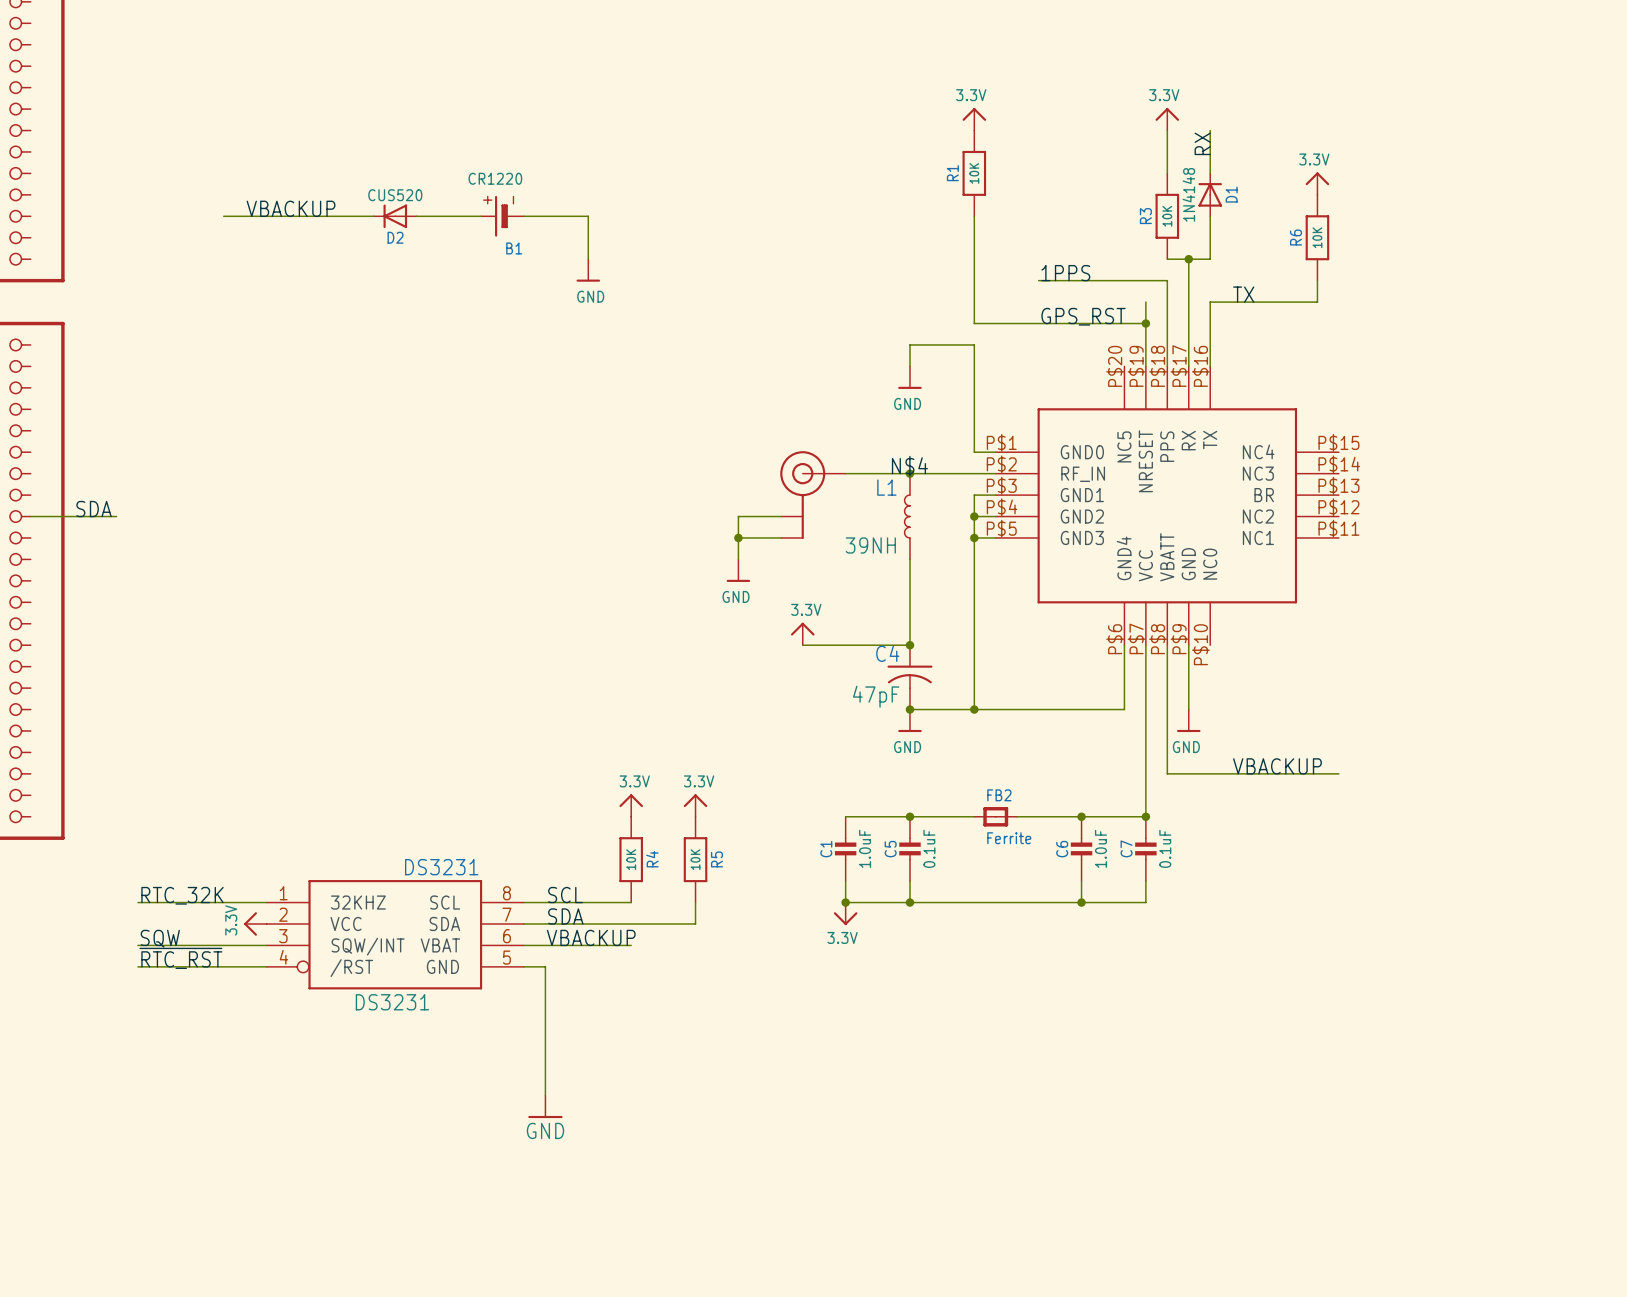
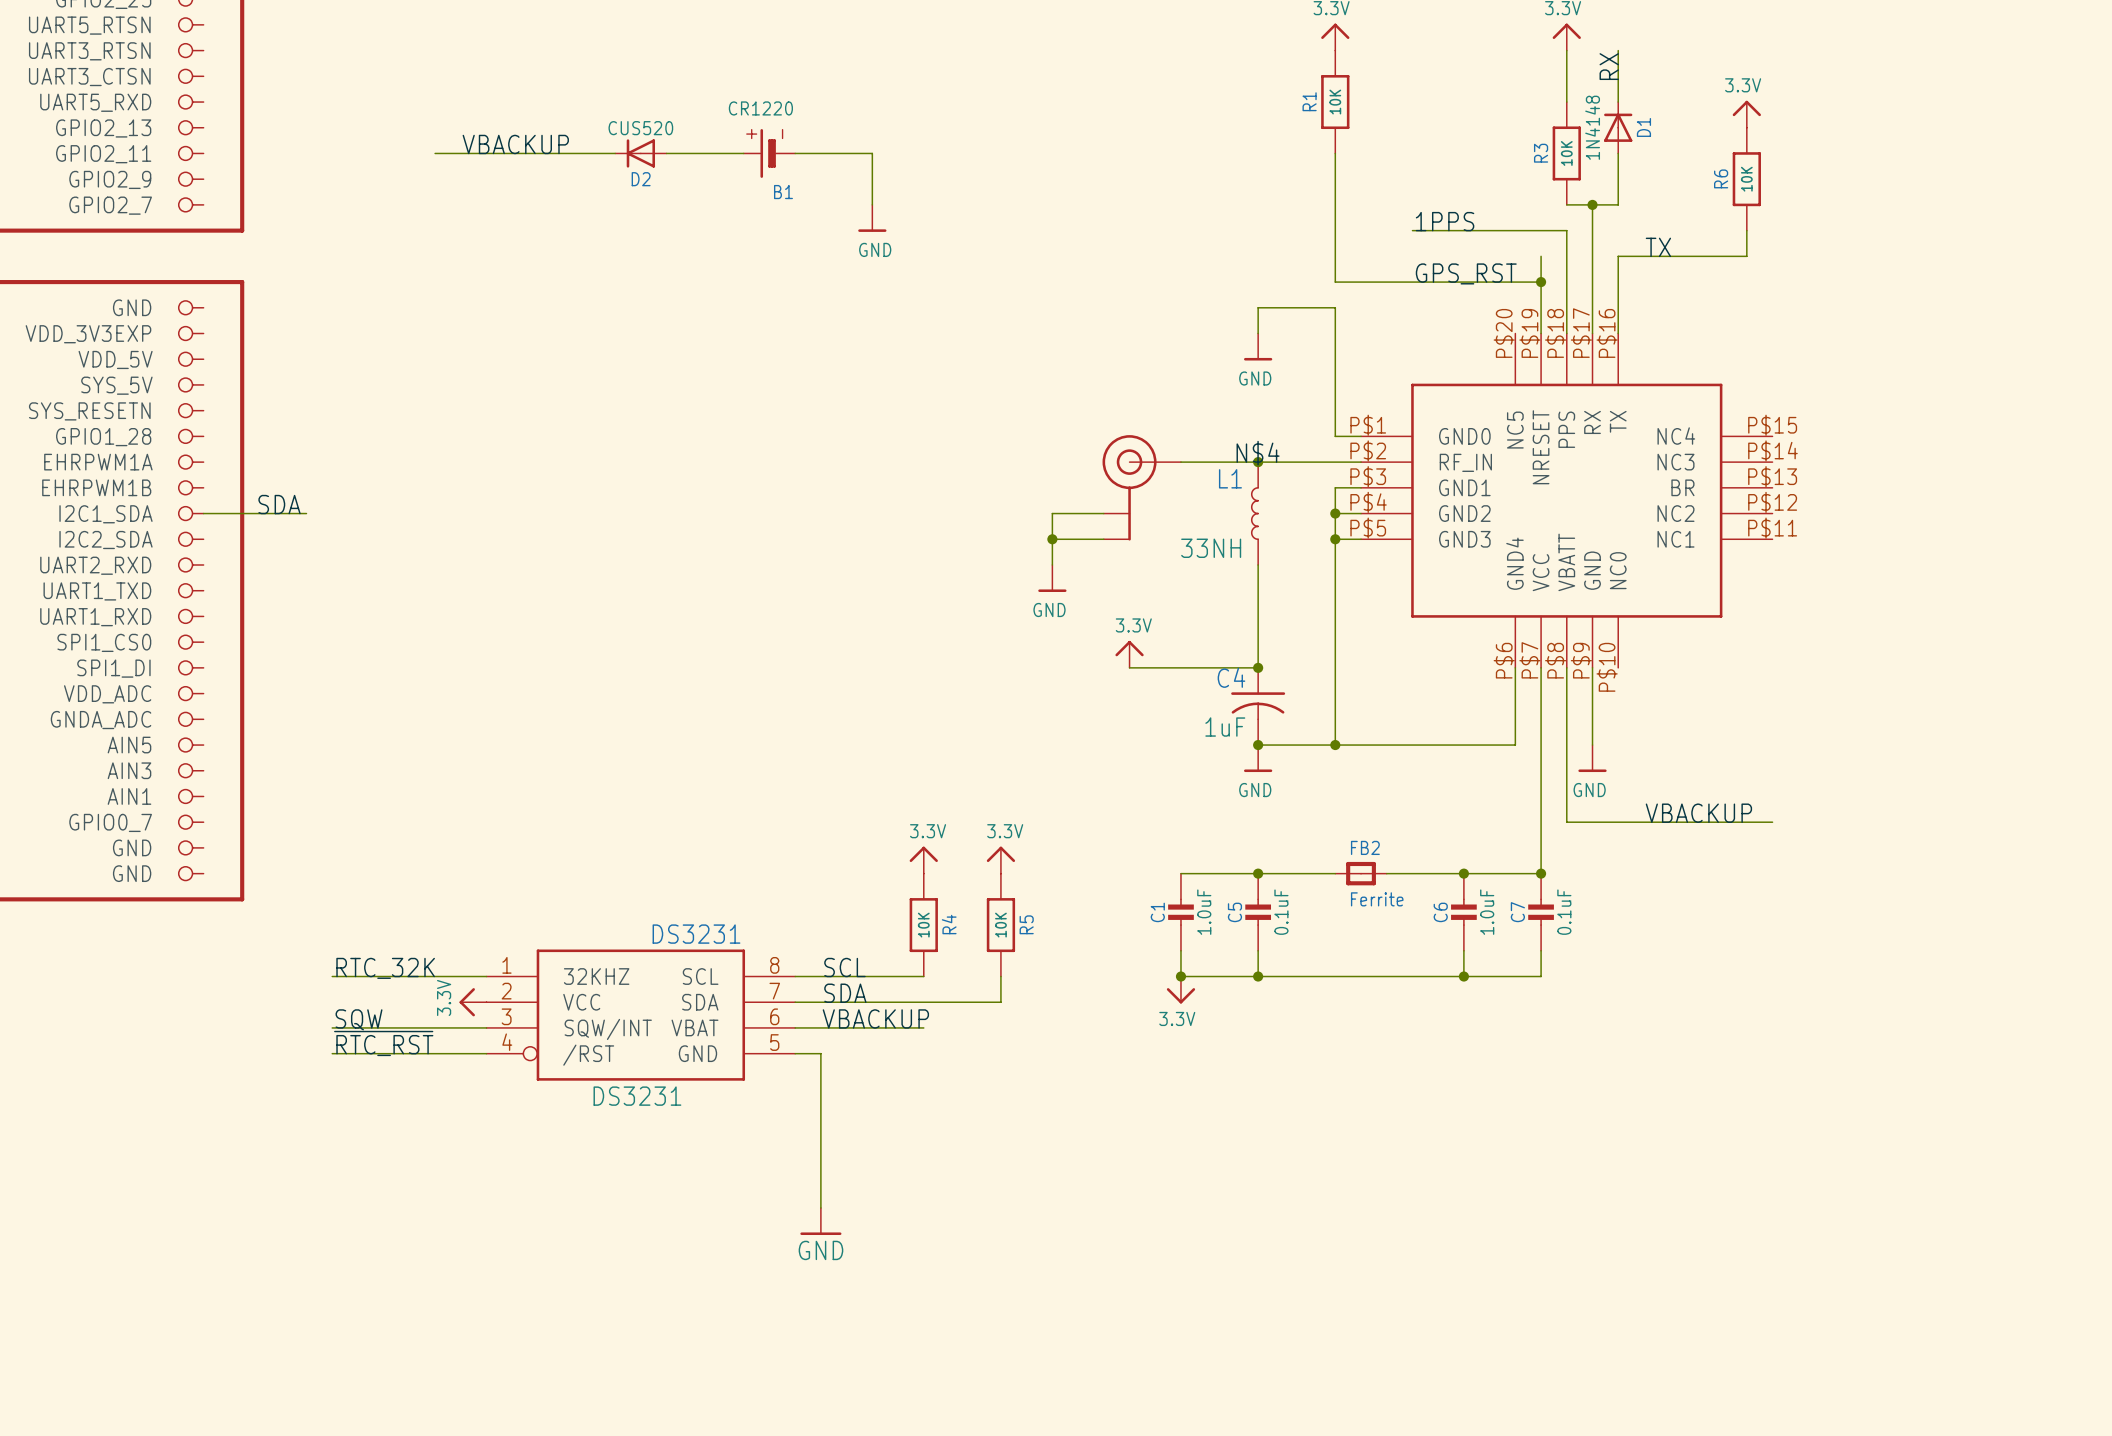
L1 value: 39NH (870, 545) -> 33NH (1211, 548)
C4 value: 47pF (876, 696) -> 1uF (1225, 727)

